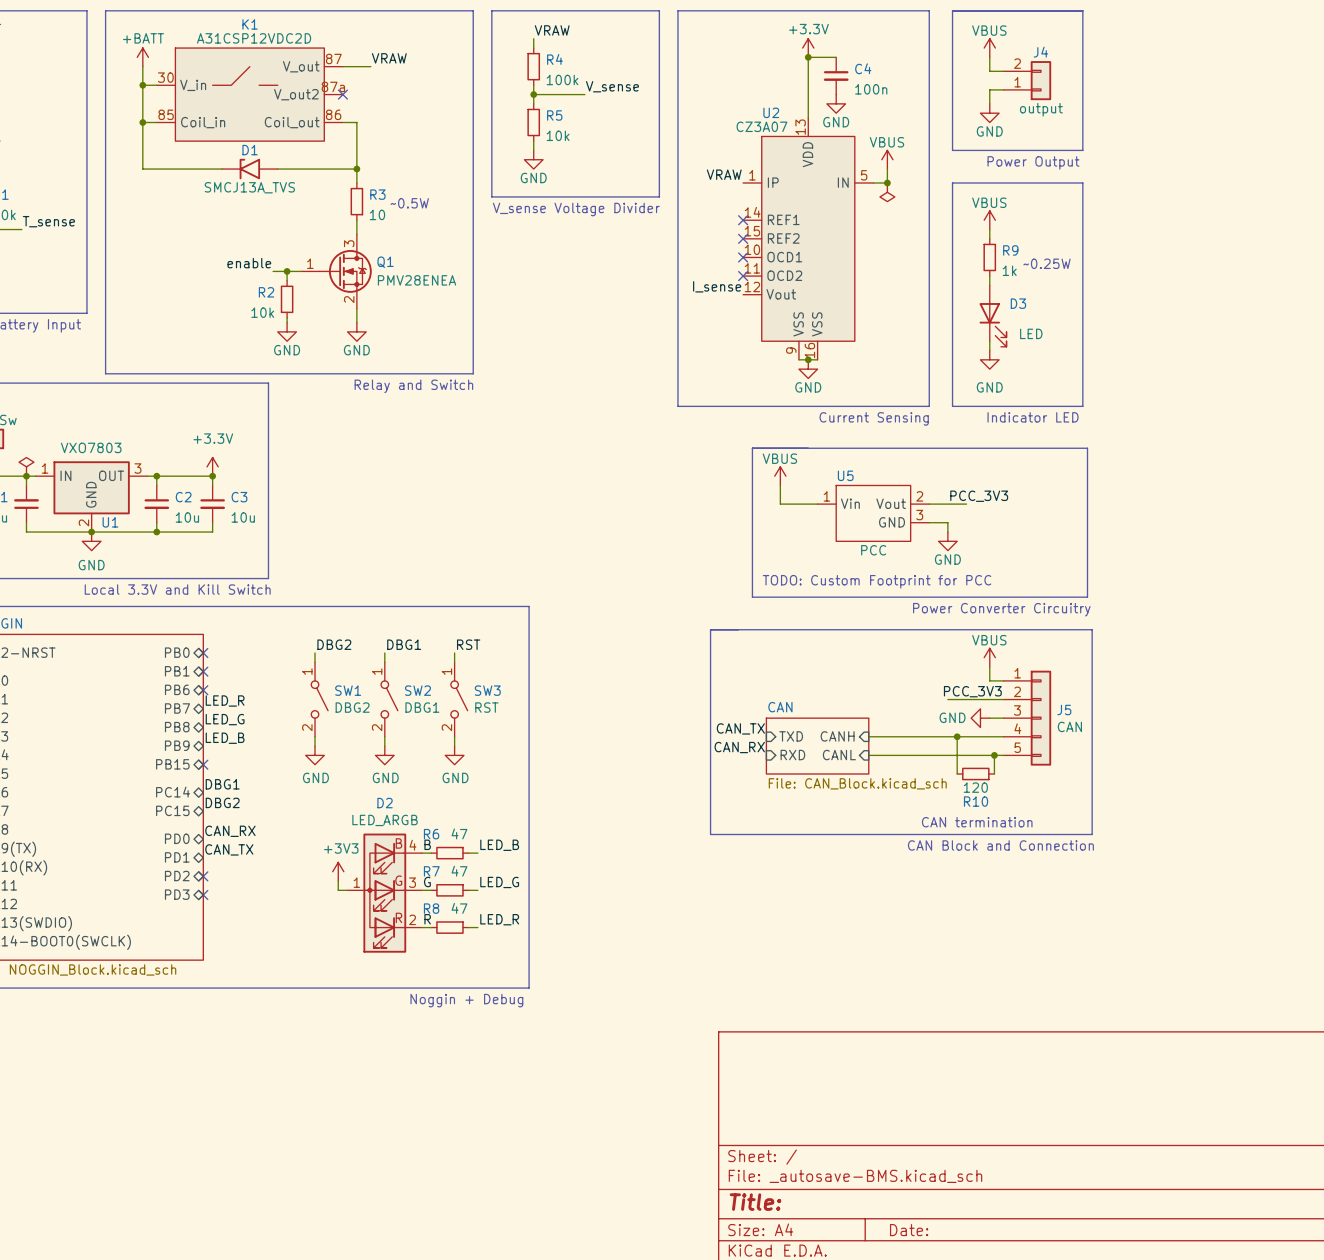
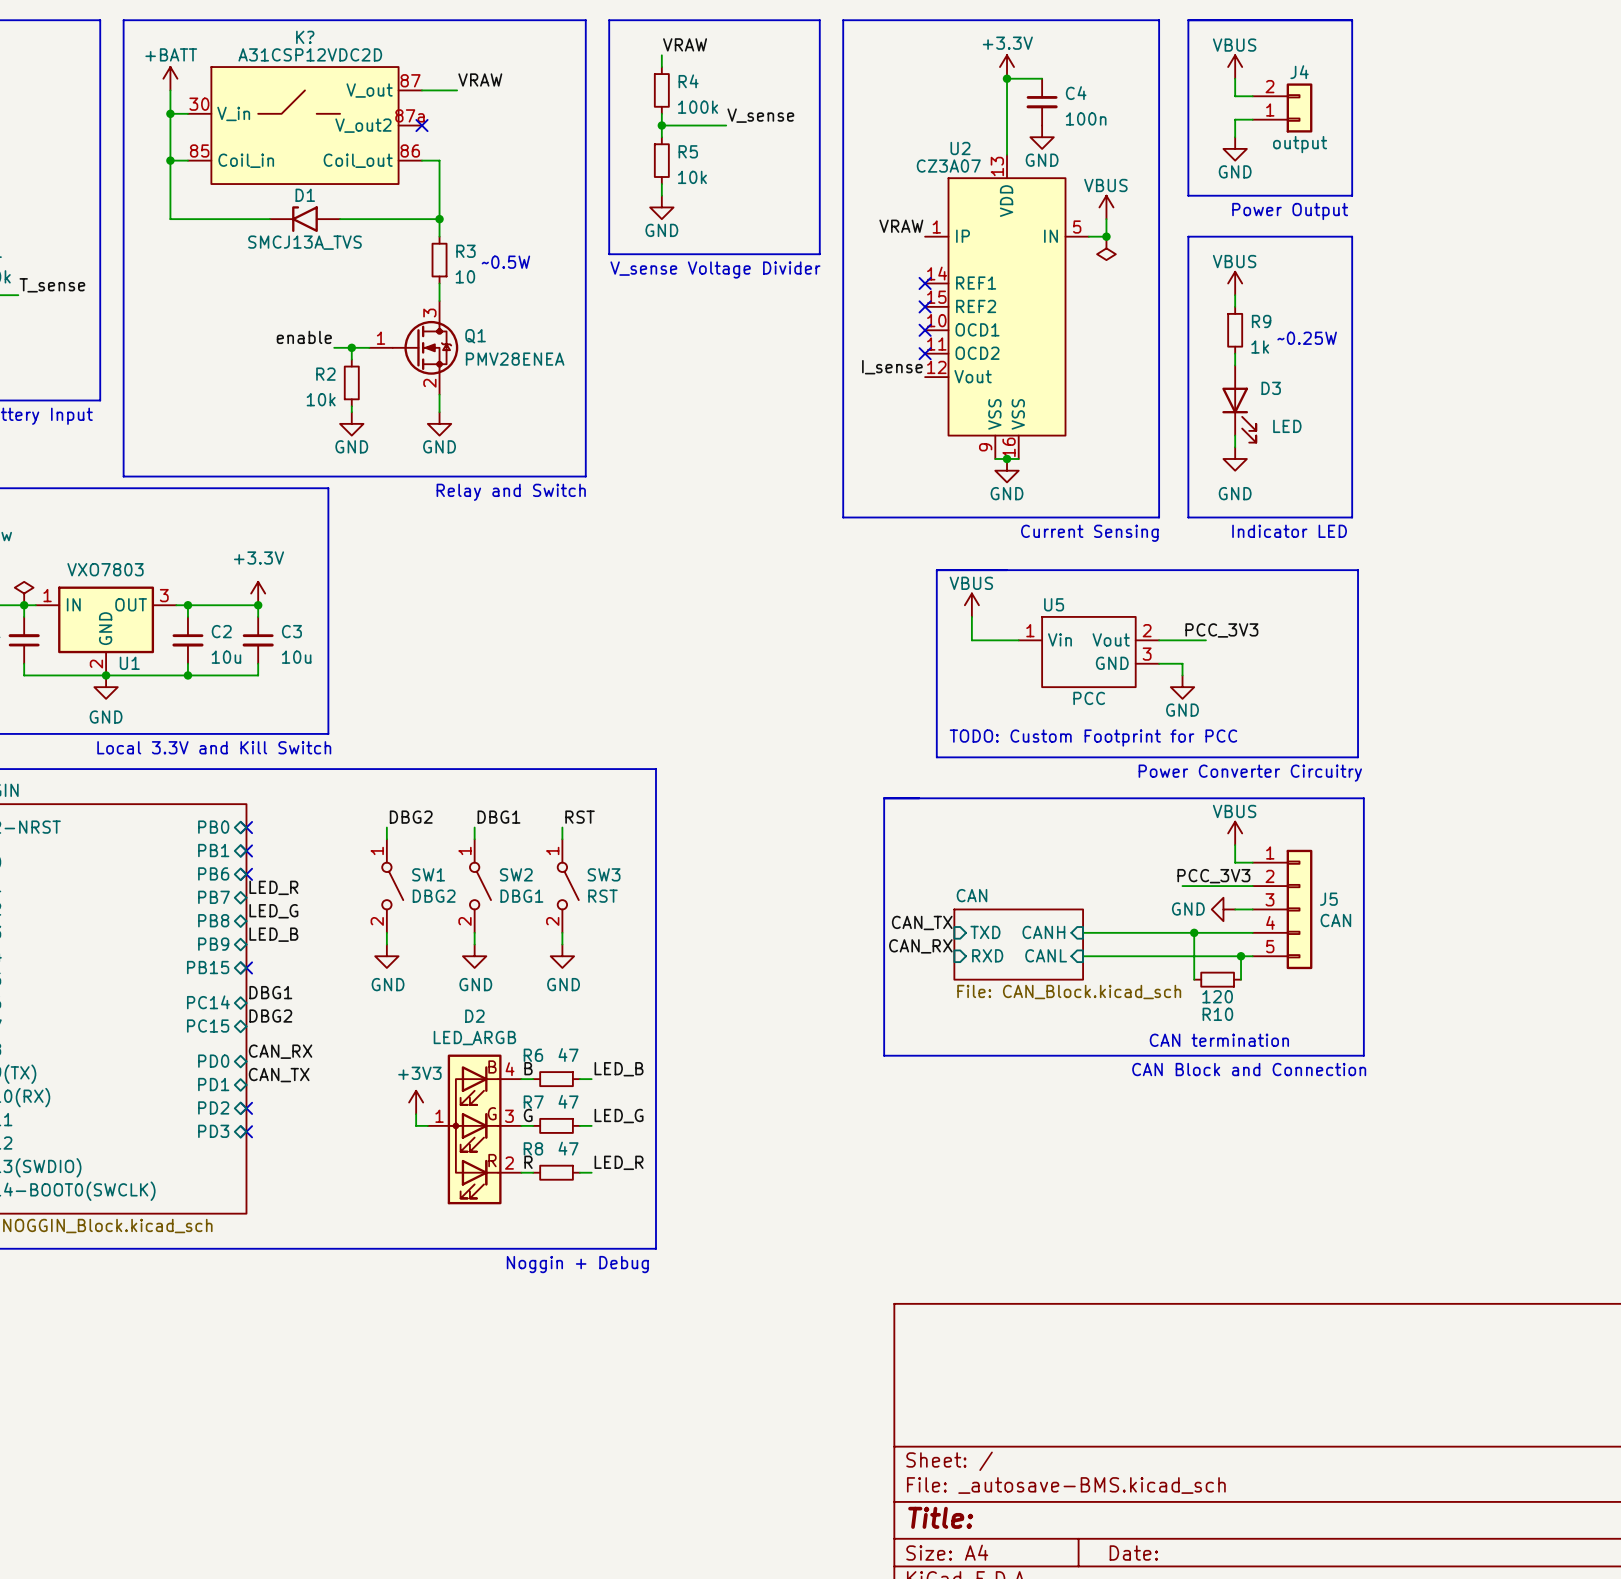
K1 name: K1 (250, 24) -> K? (305, 37)

